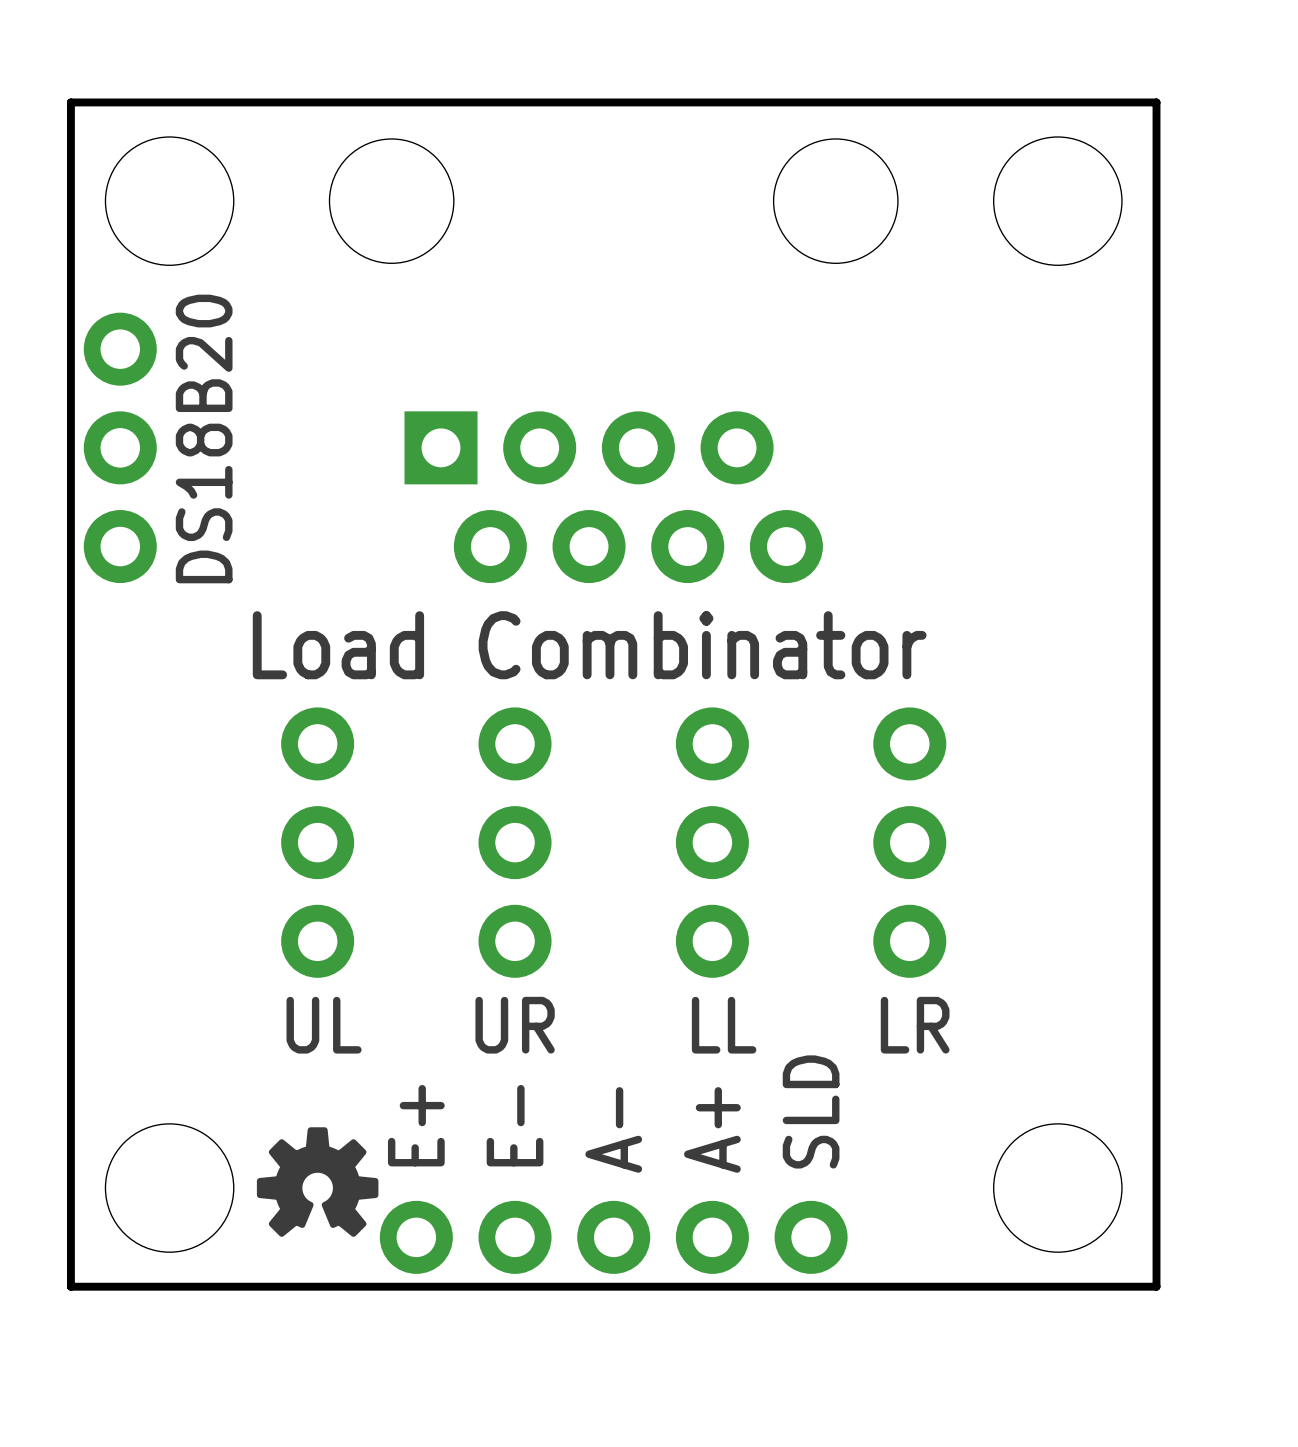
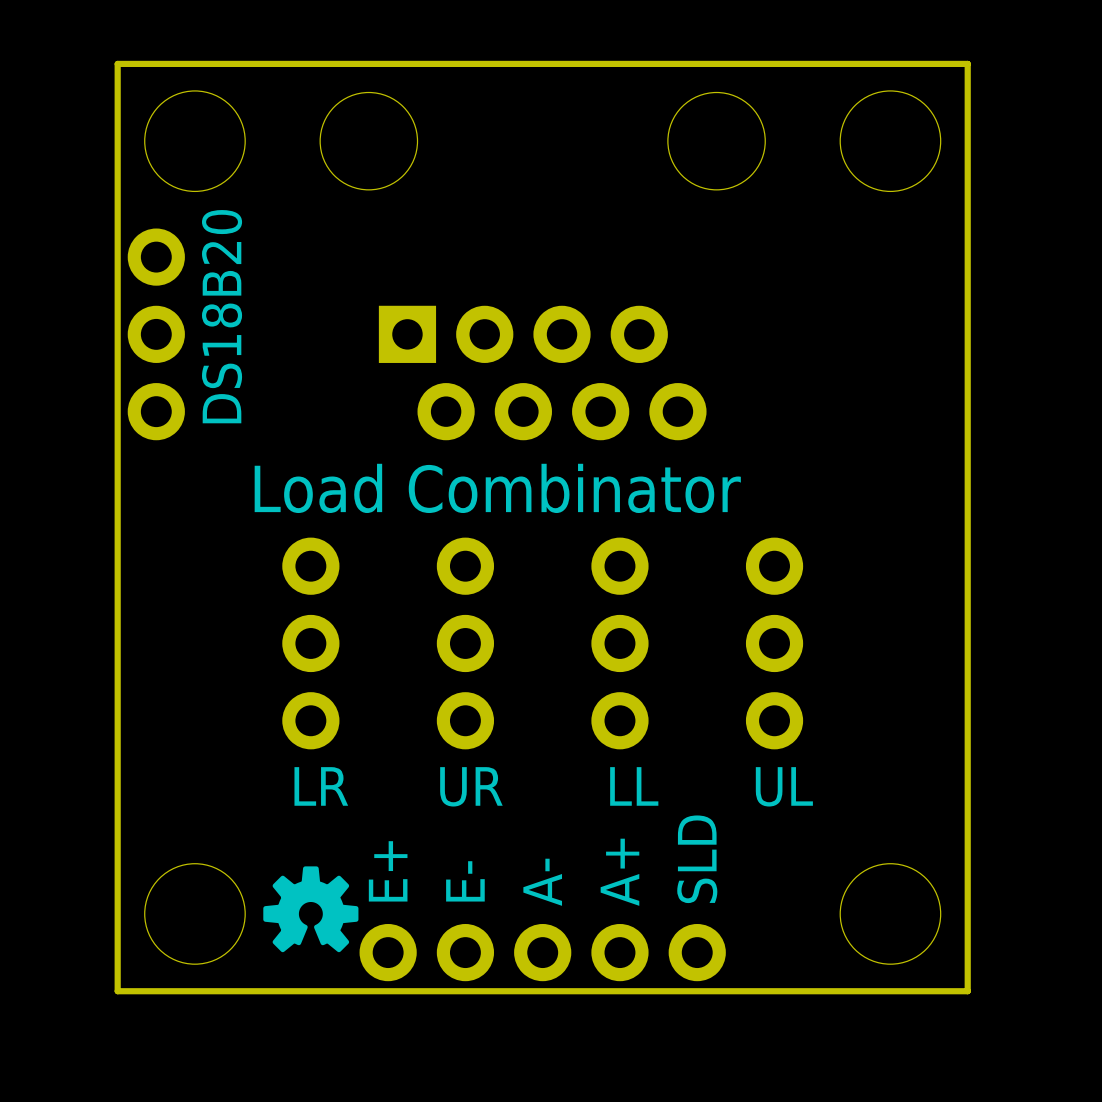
text: UL (324, 1025) -> LR (321, 786)
text: LR (915, 1025) -> UL (784, 786)

